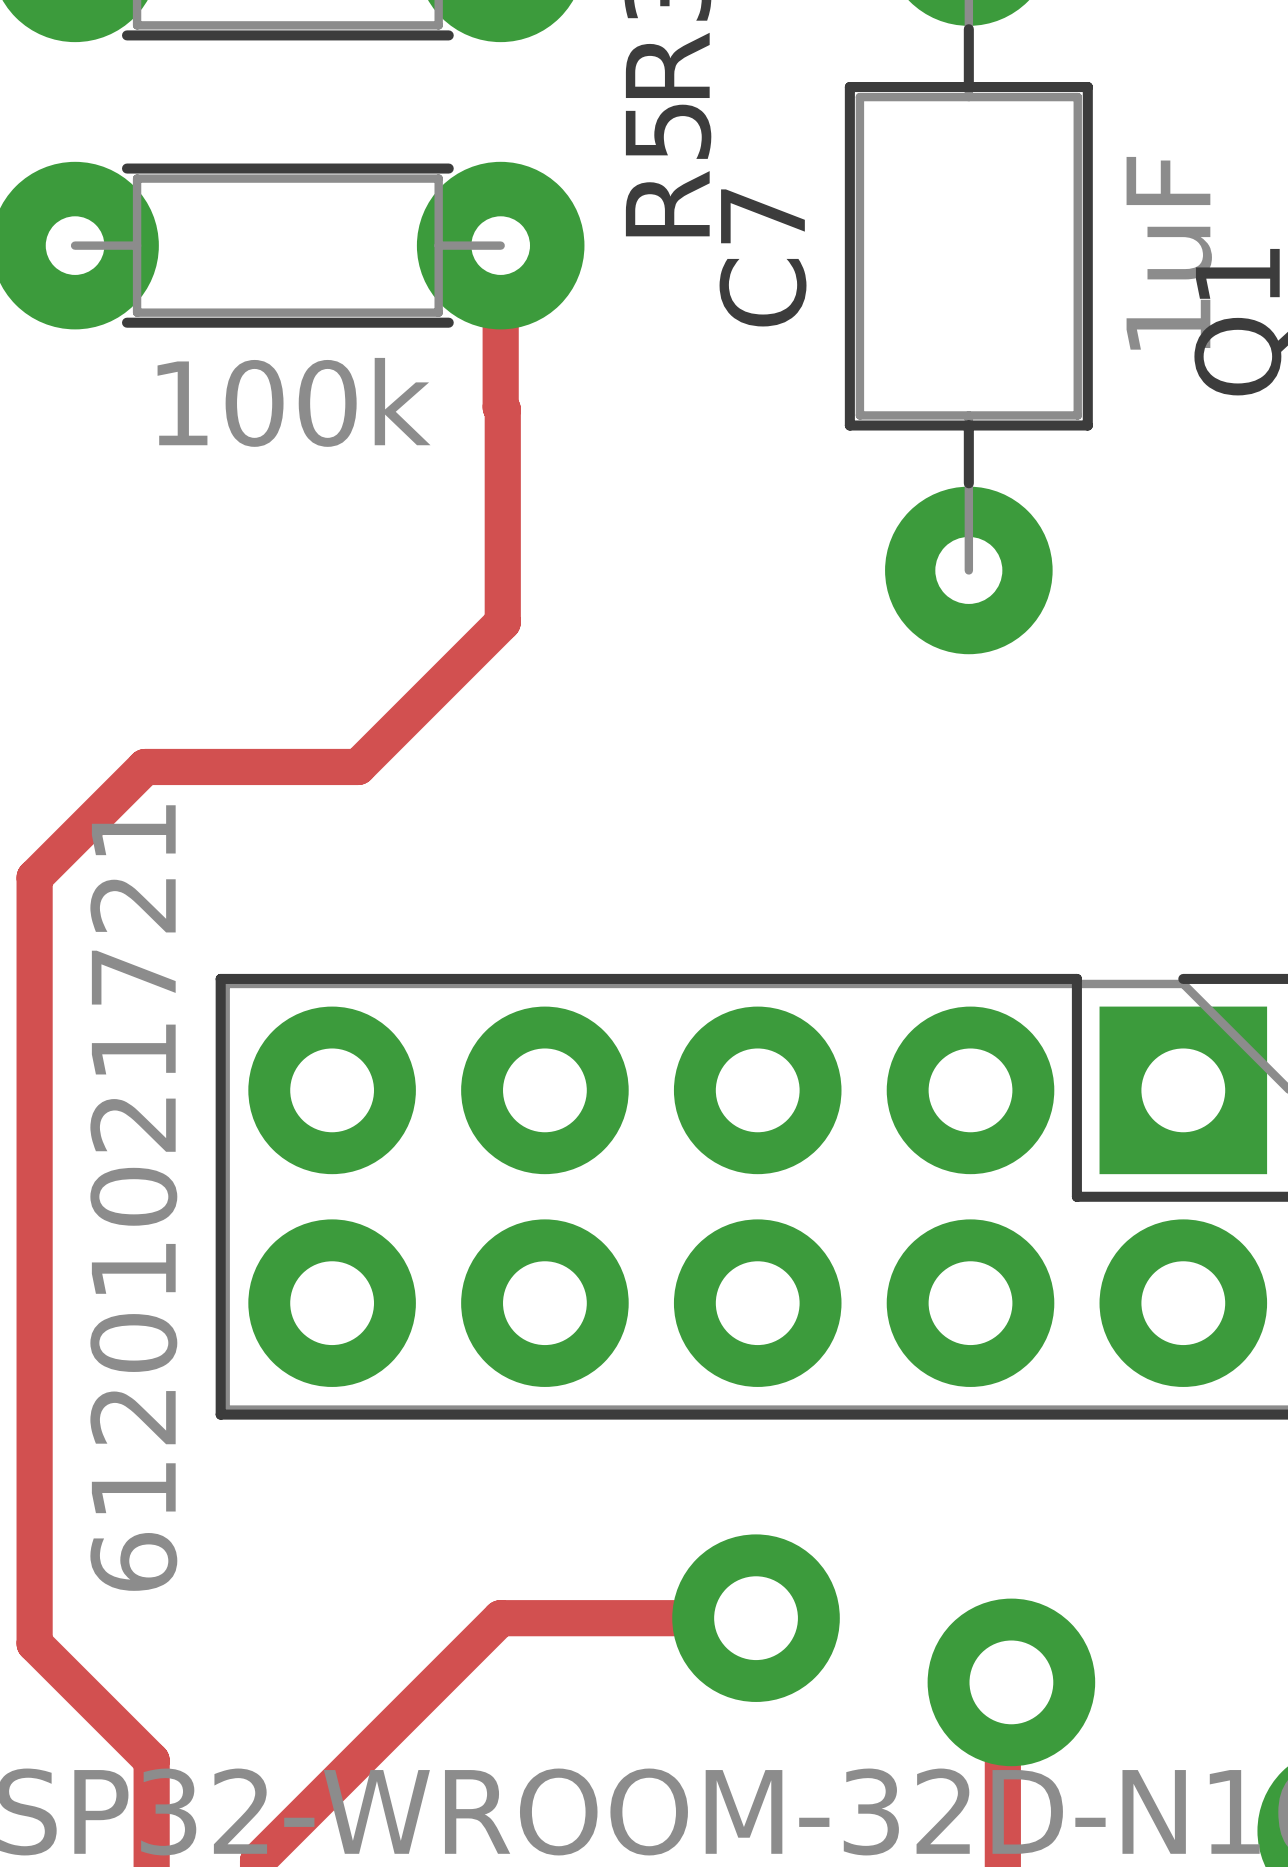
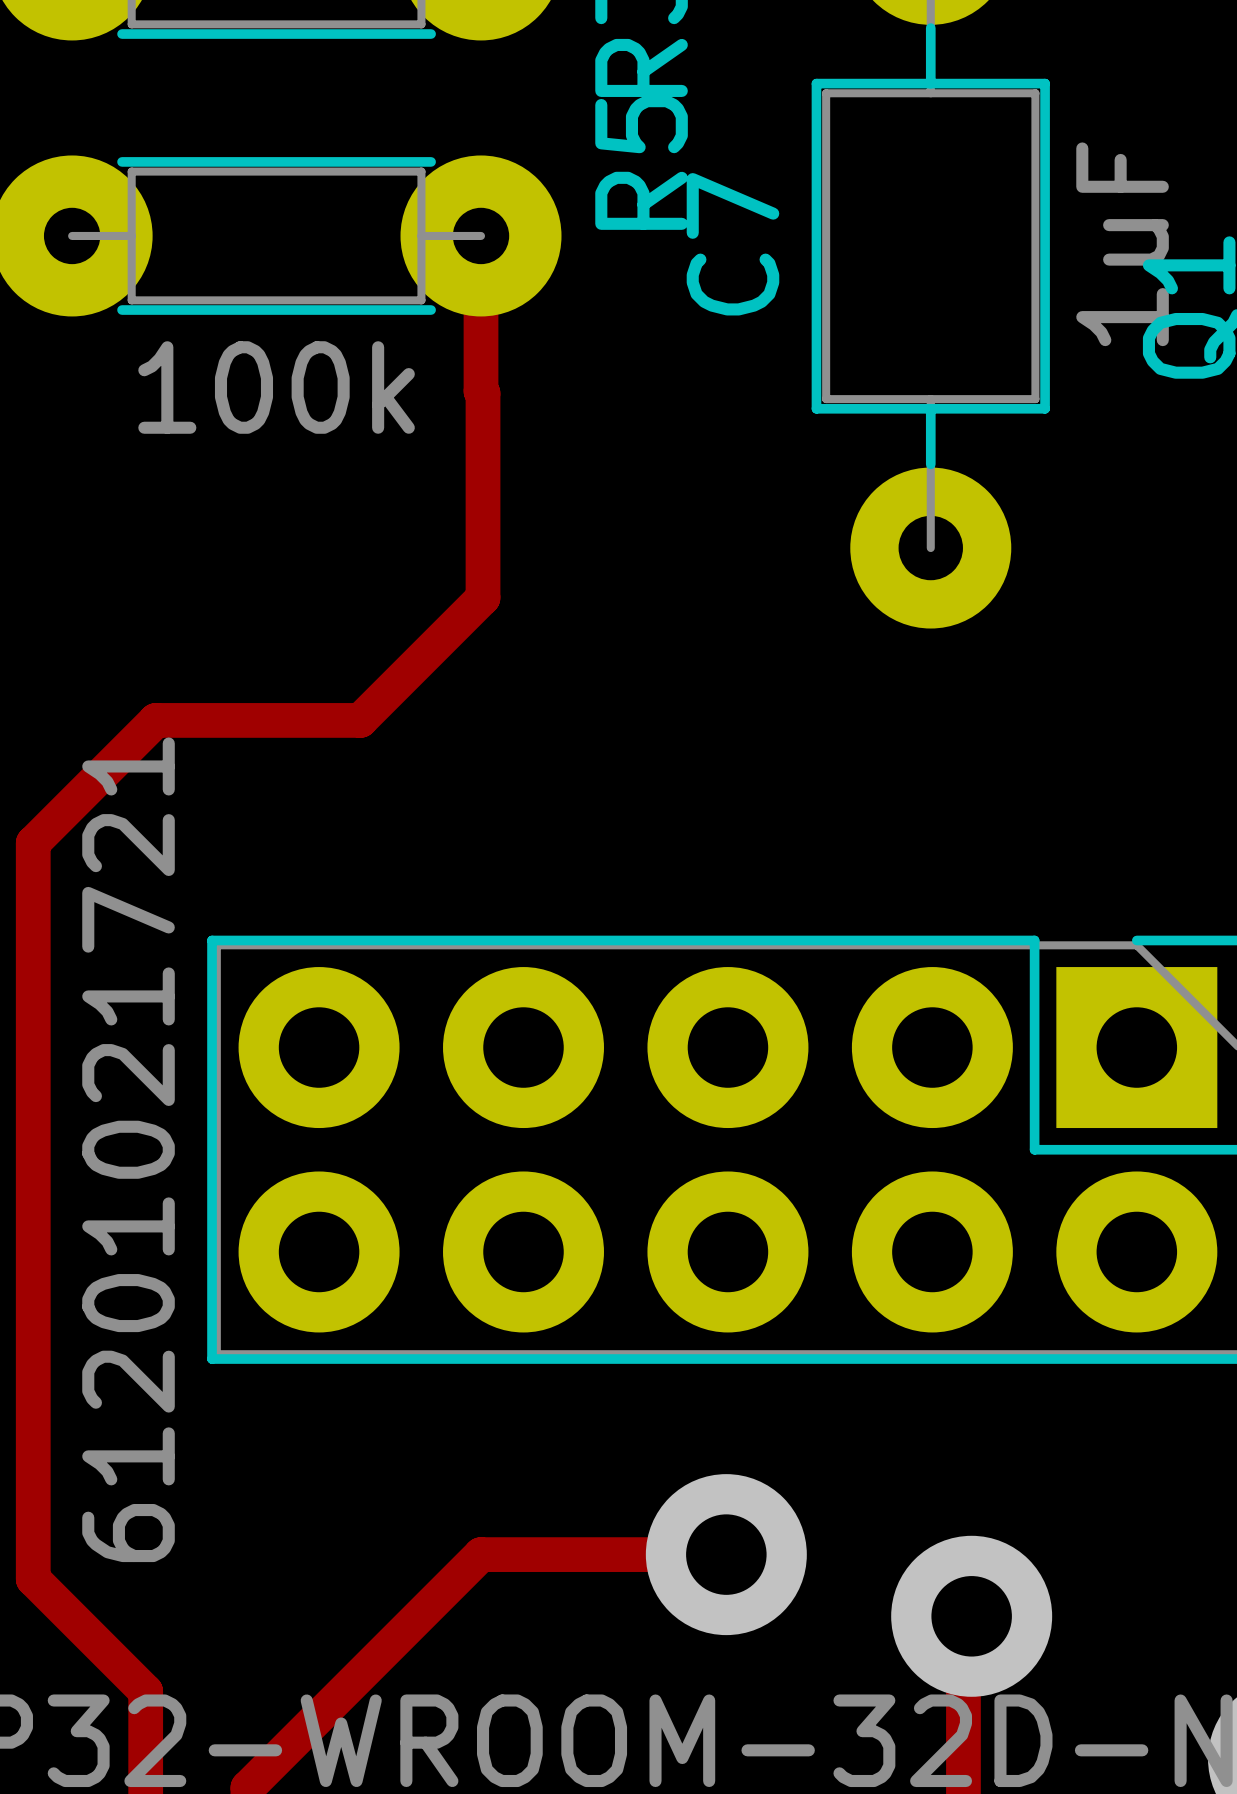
track: (375, 749) (358, 766) (145, 766) -> (360, 720) (155, 720) (139, 736)

